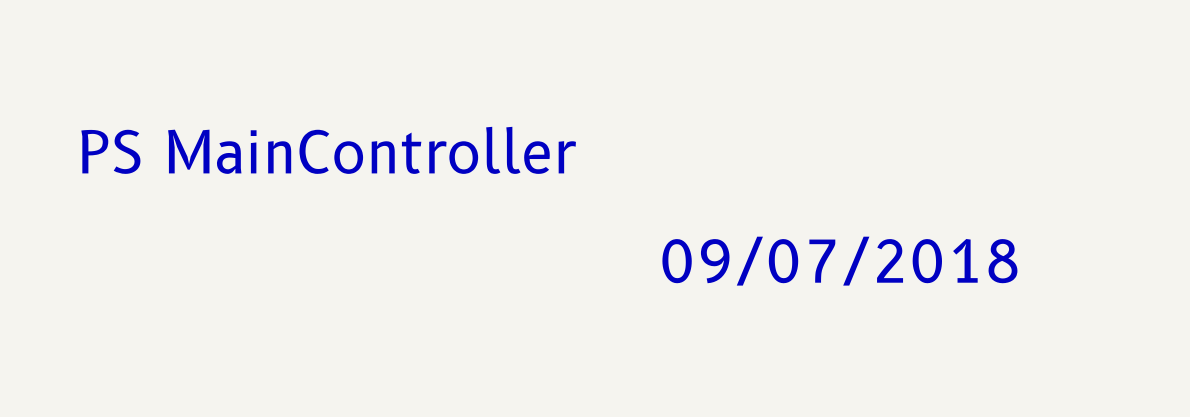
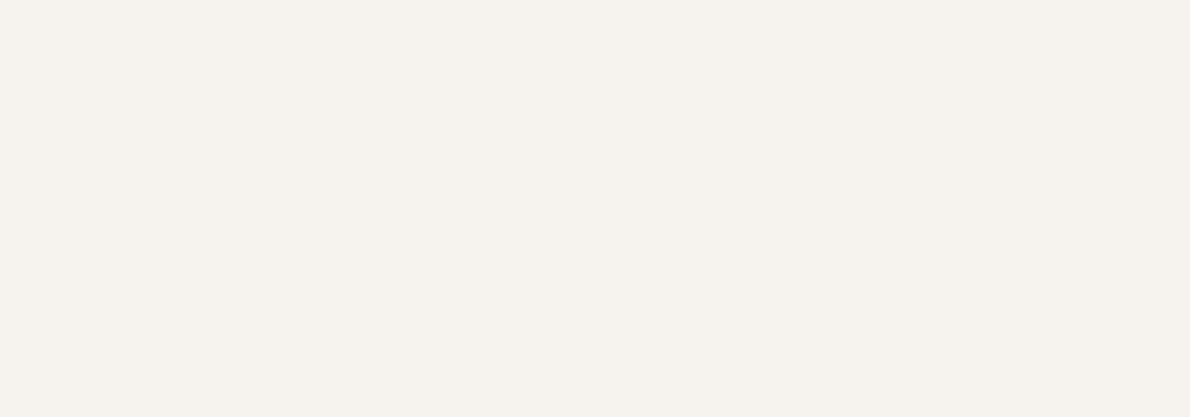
text: PS MainController (328, 150) -> none
text: 09/07/2018 (839, 261) -> none

